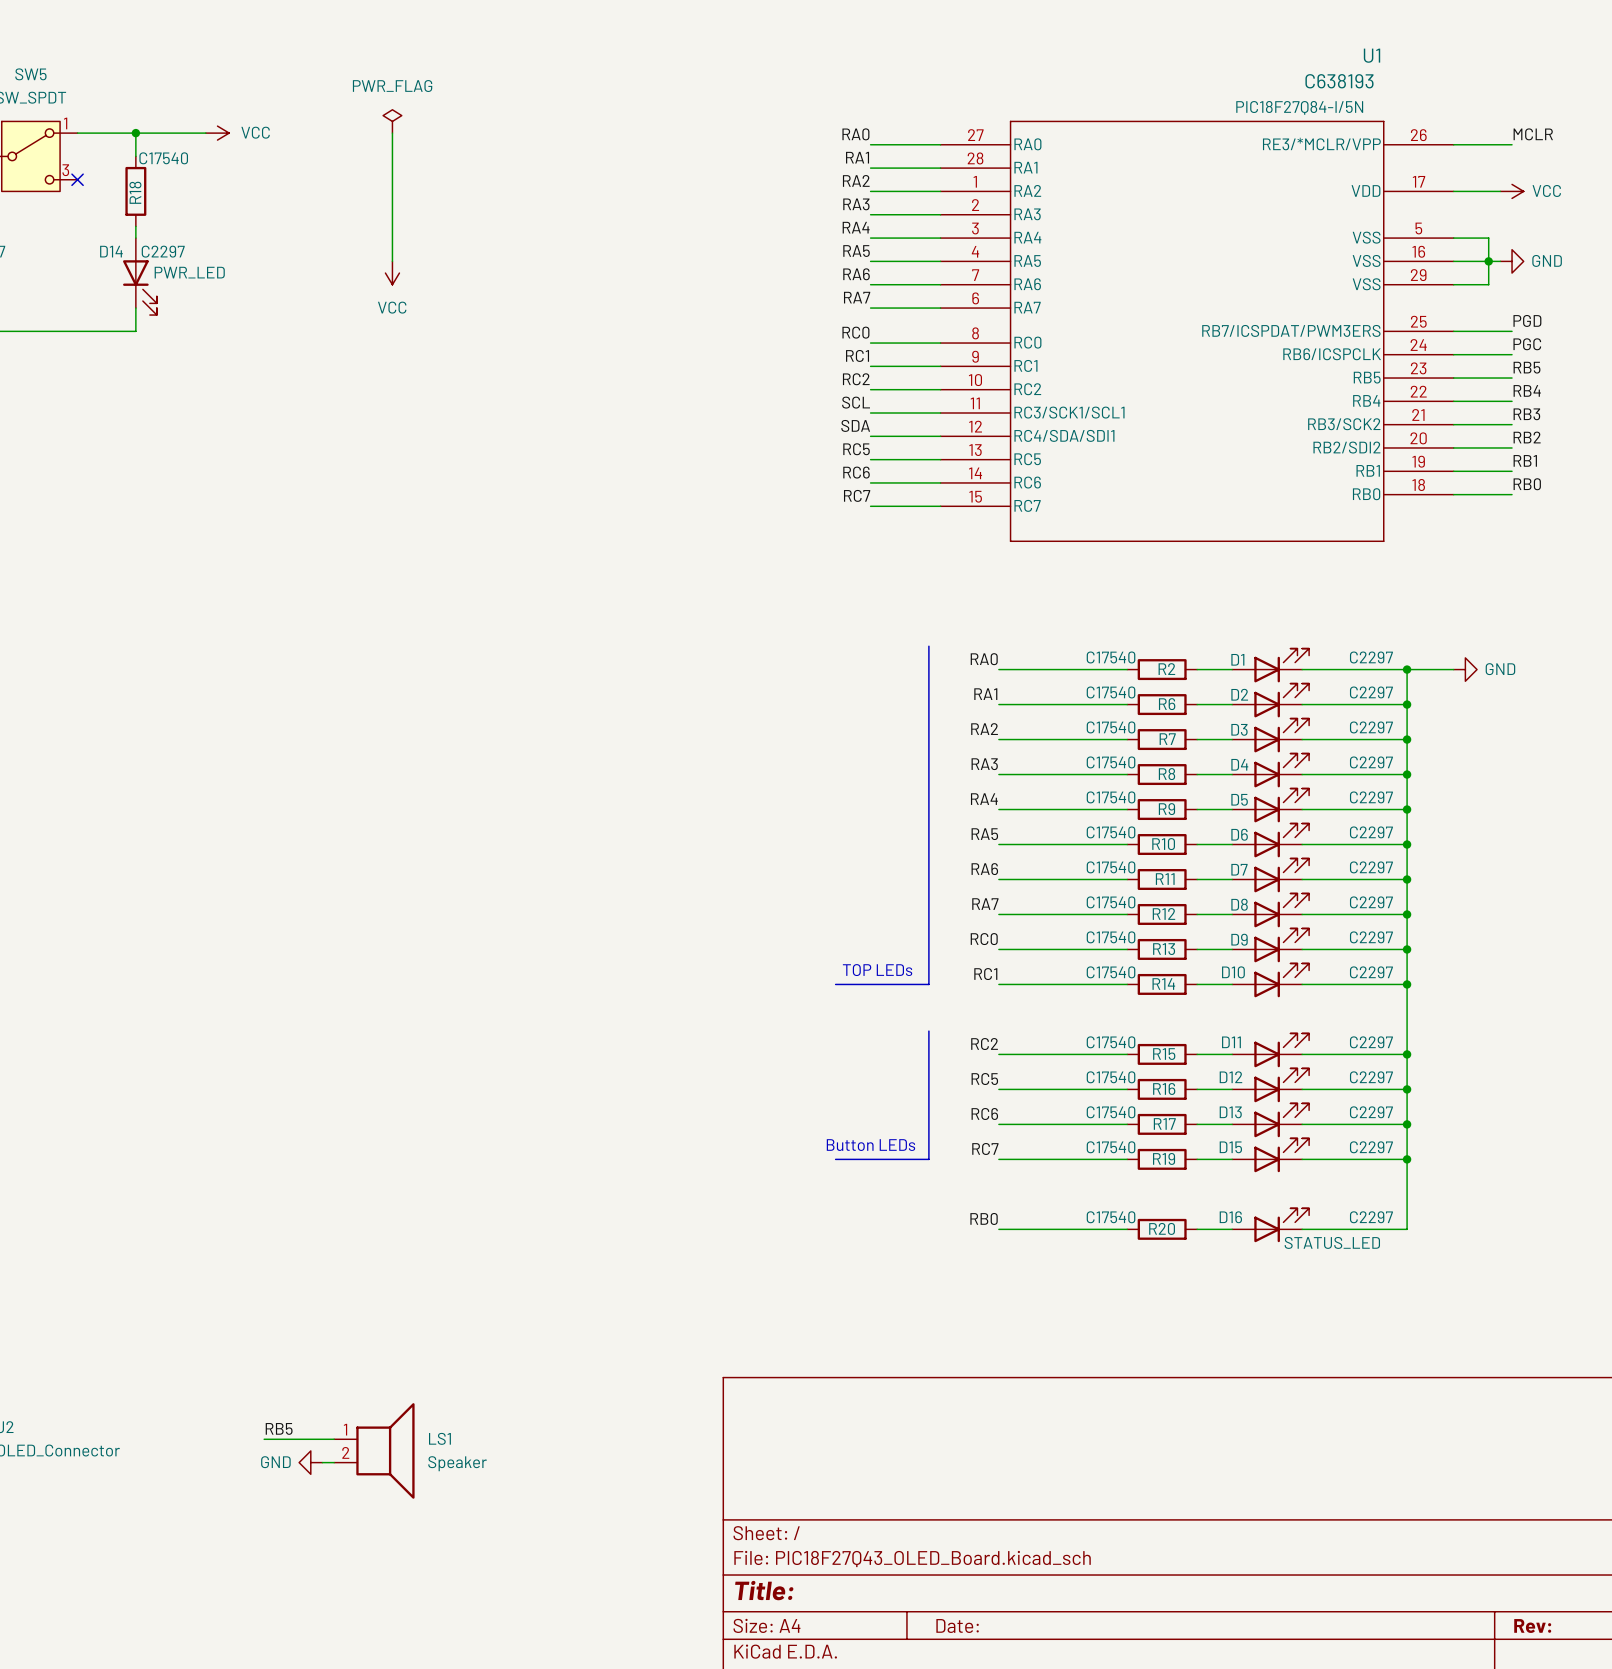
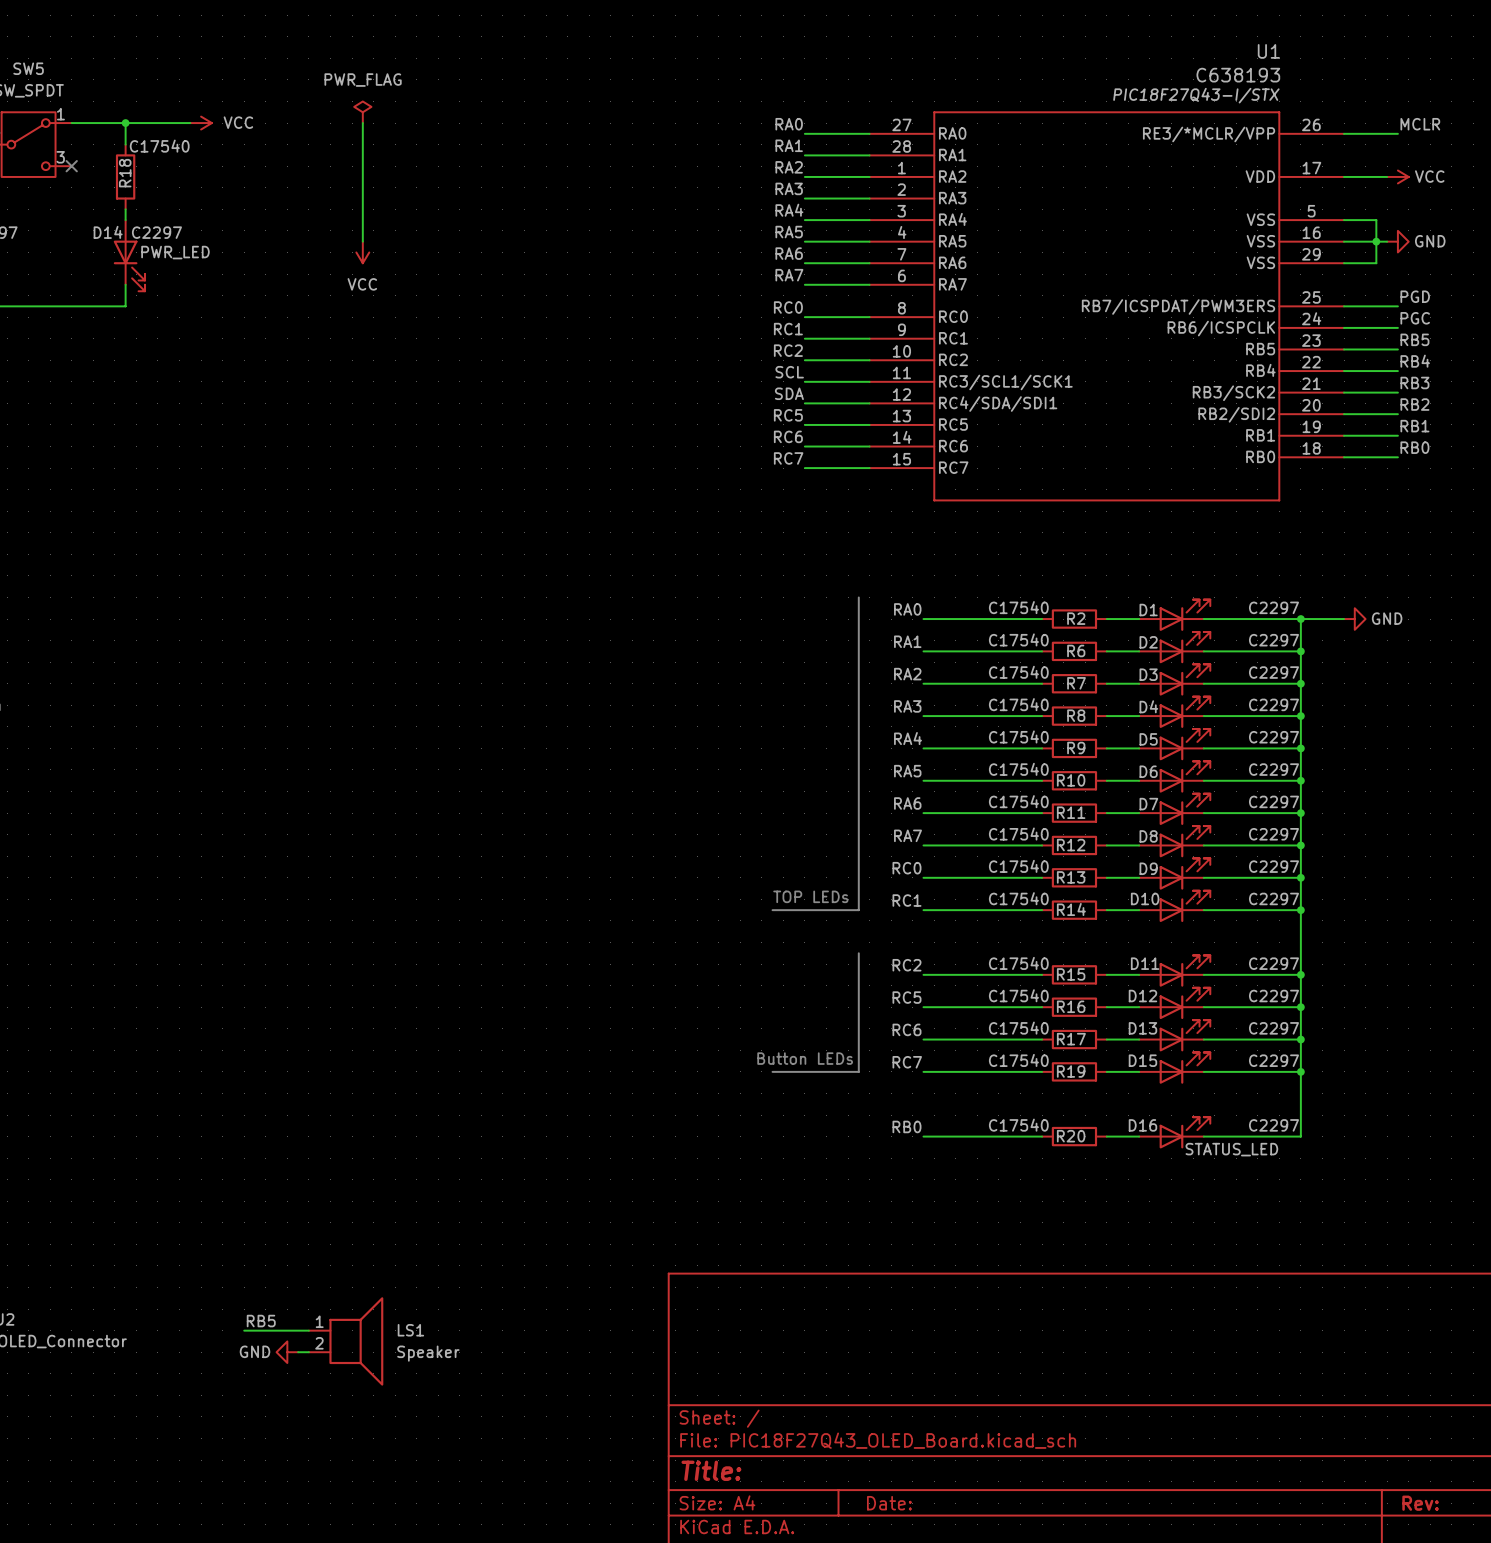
U1 text: none -> PIC18F27Q43-I/STX (1196, 95)
U1 text: PIC18F27Q84-I/5N (1299, 107) -> none
U1 pin name: RC3/SCK1/SCL1 (1069, 412) -> RC3/SCL1/SCK1 (1005, 382)

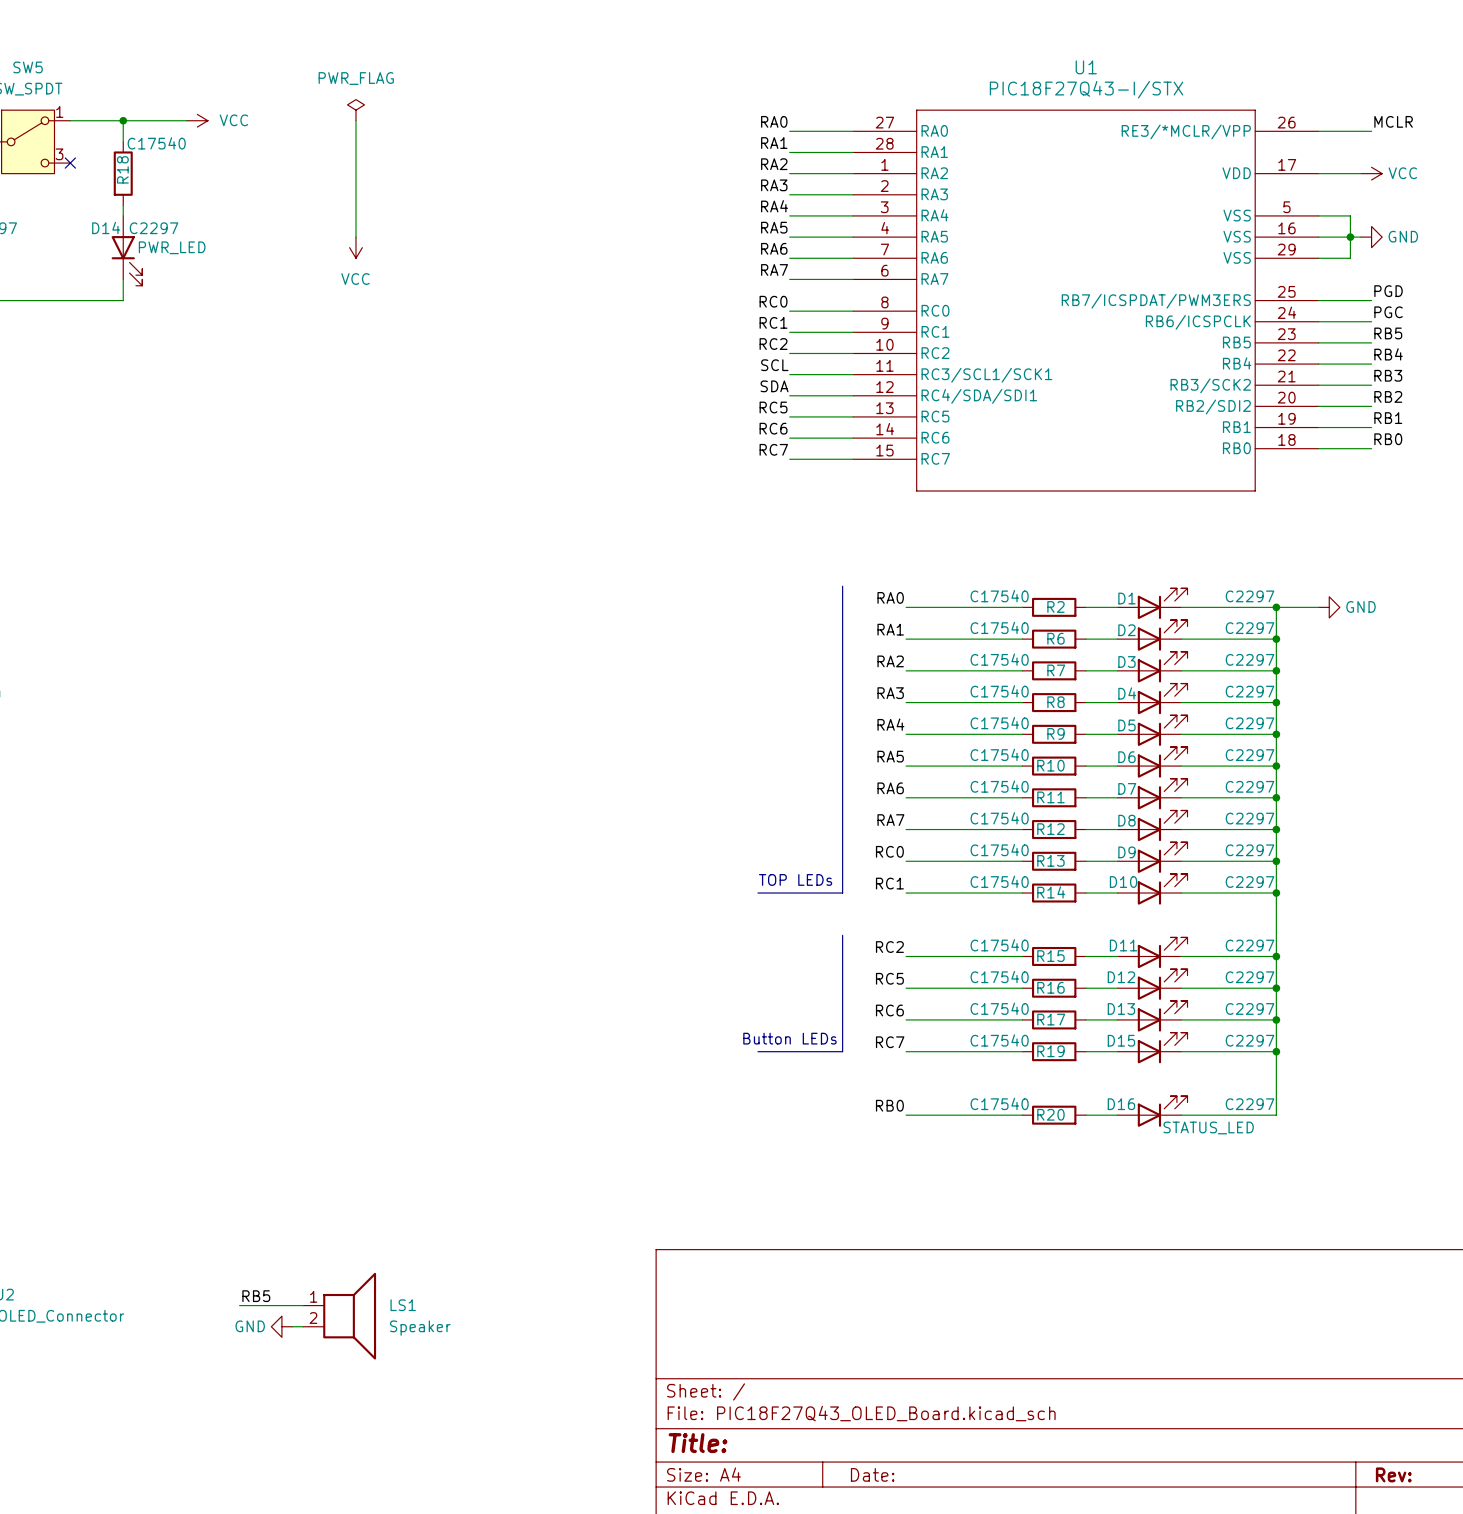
U1 name position: U1 (1268, 51) -> U1 (1086, 67)
U1 value: C638193 (1238, 75) -> PIC18F27Q43-I/STX (1086, 89)
U1 text: PIC18F27Q43-I/STX (1196, 95) -> none

